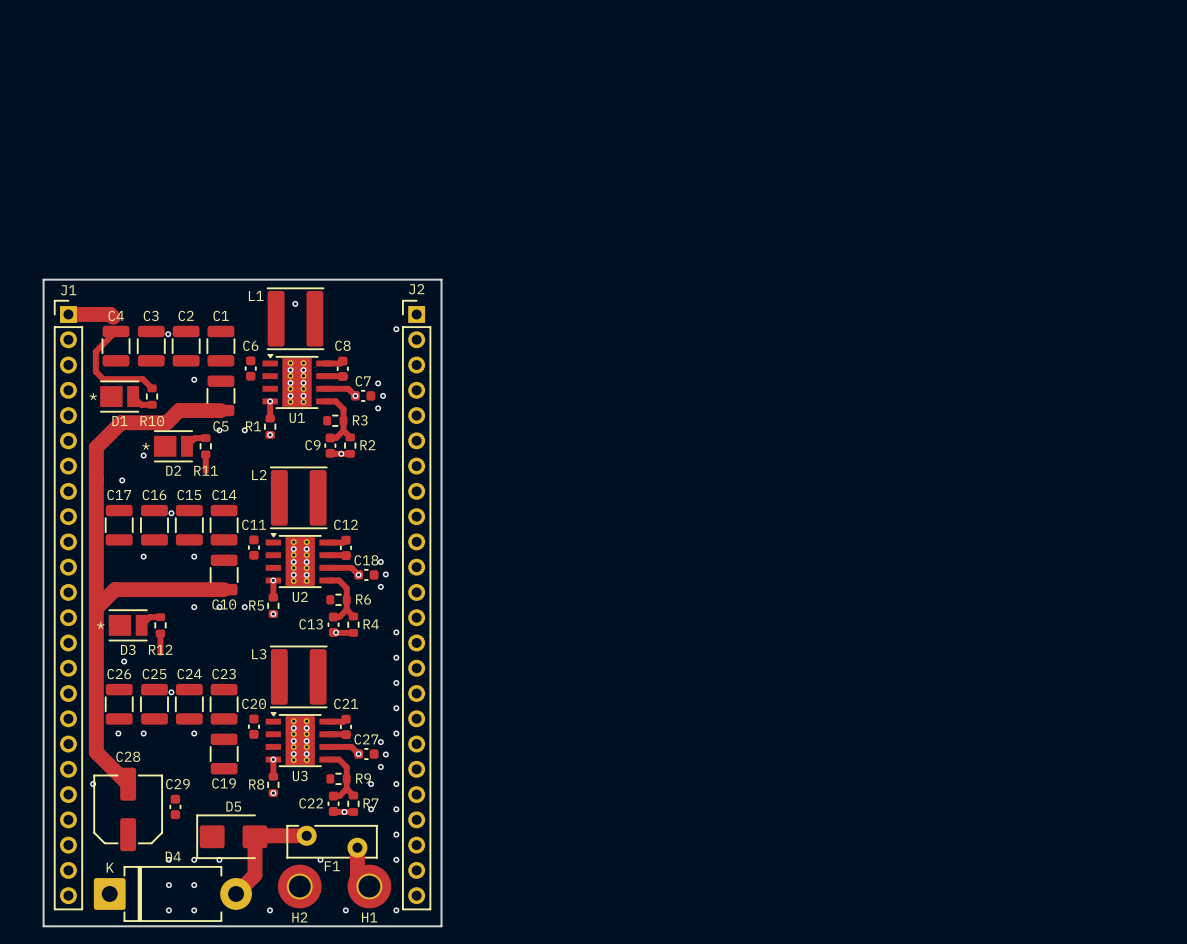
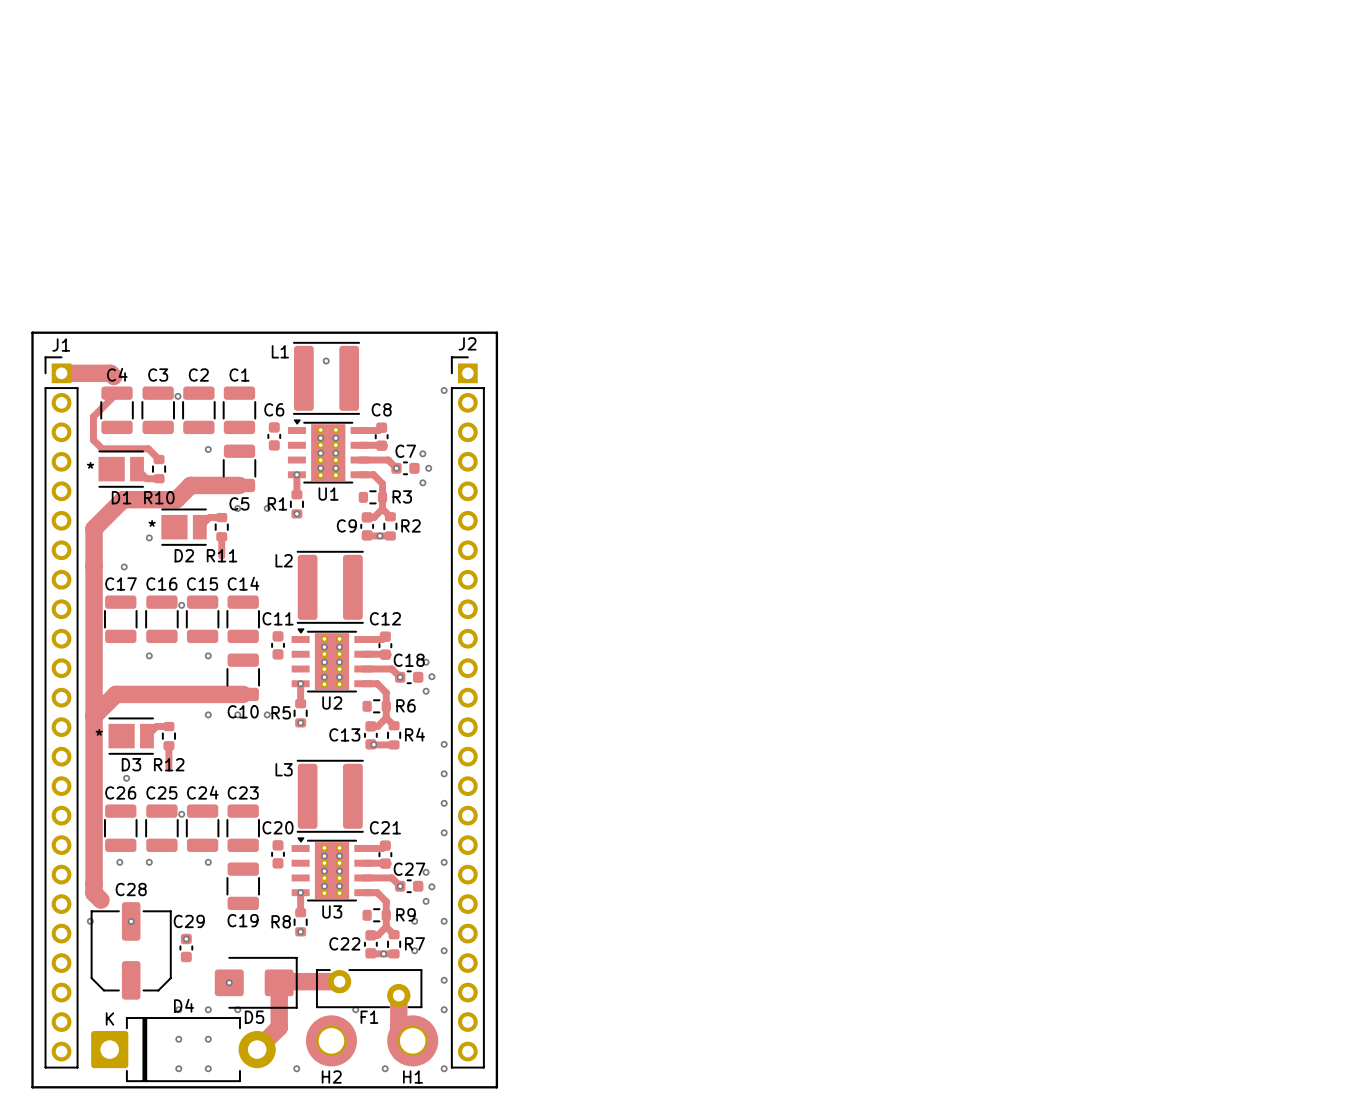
track: (96, 752) (128, 784) -> (94, 884) (94, 893) (101, 900)
via: none -> (131, 921)
via: none -> (186, 938)
via: none -> (229, 982)
D5 rotation: 0° (232, 836) -> 180° (256, 982)

